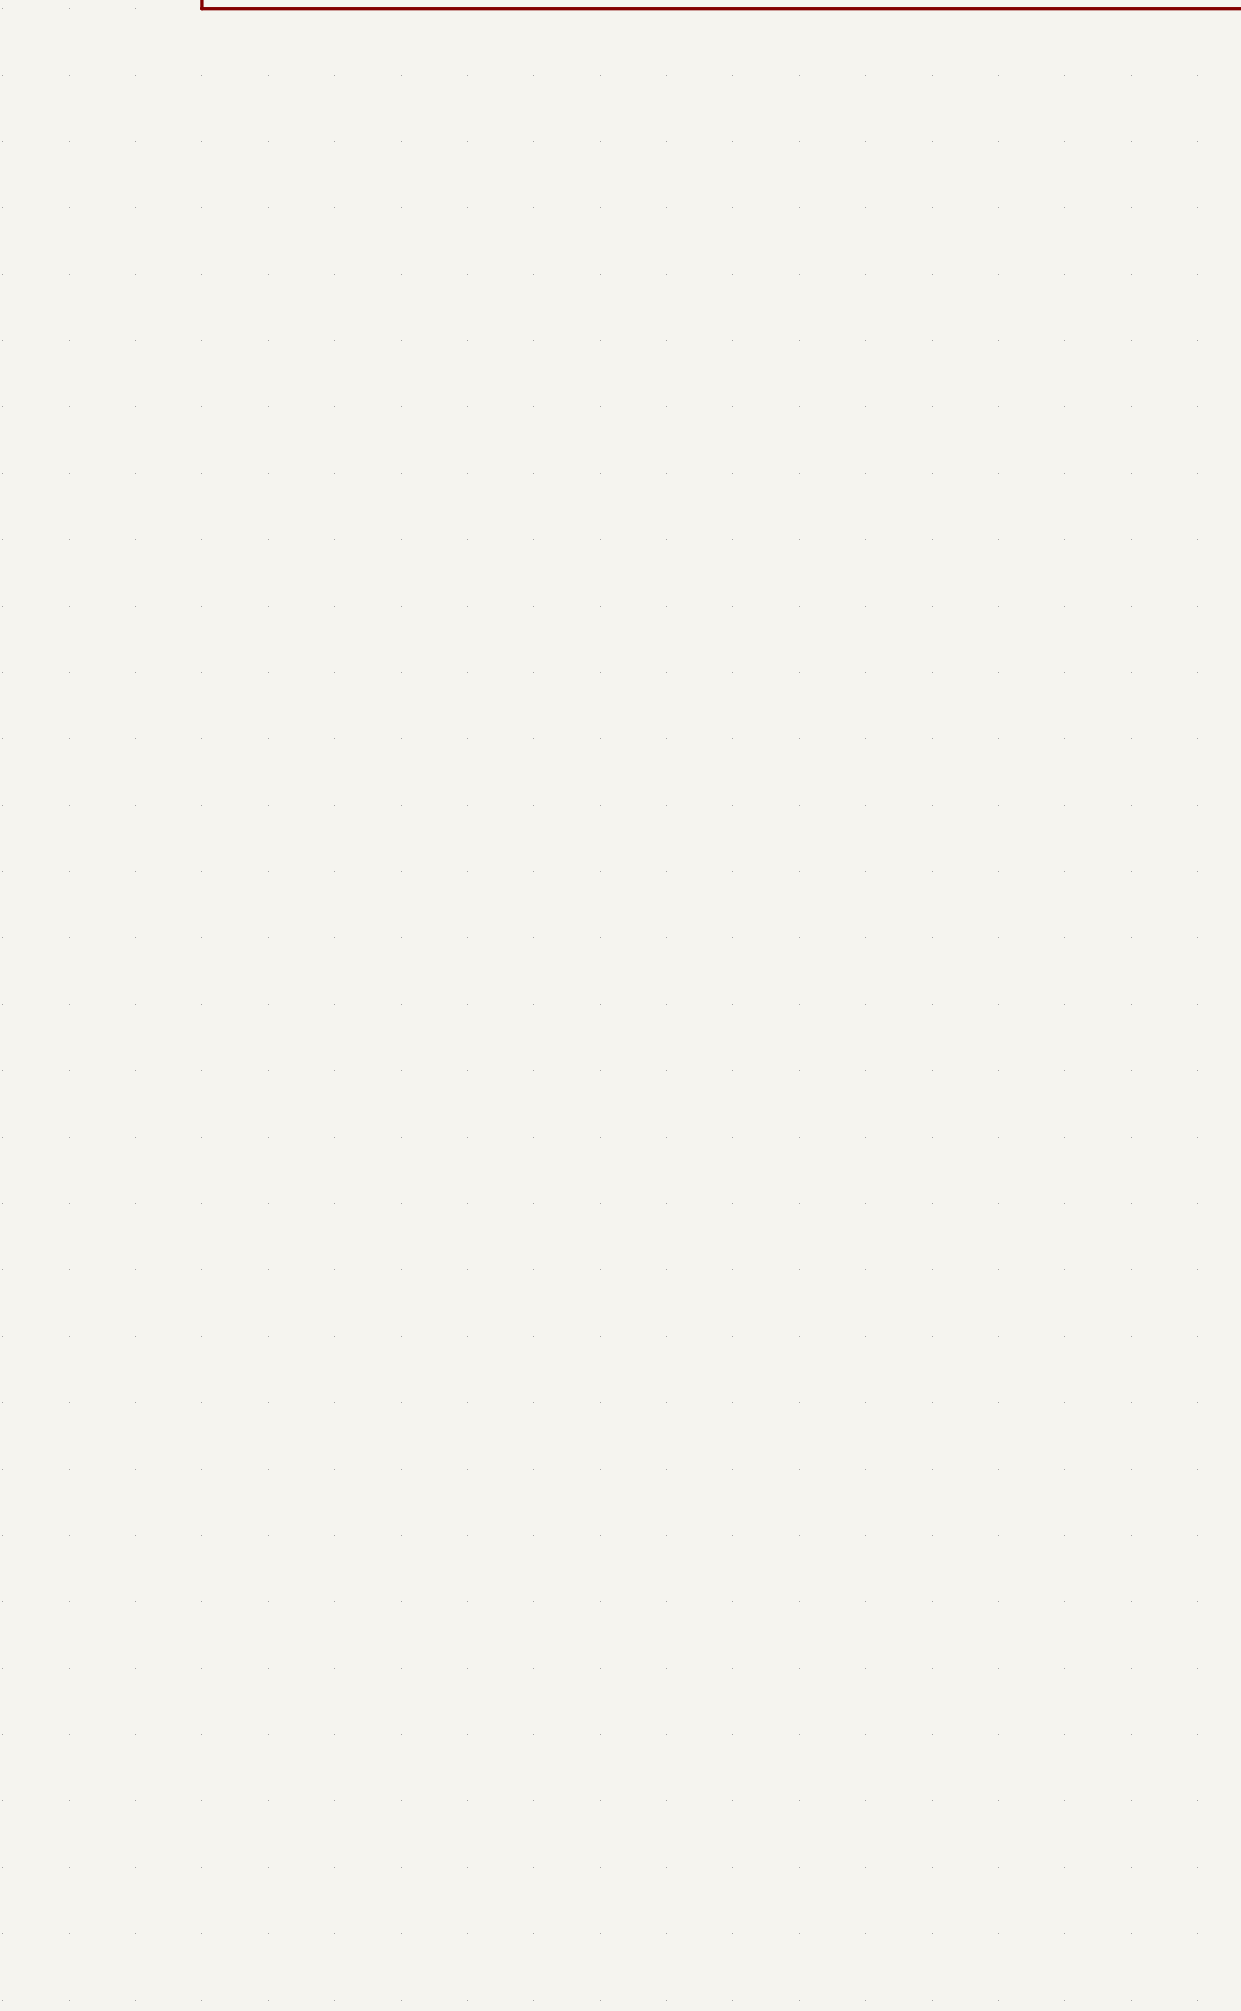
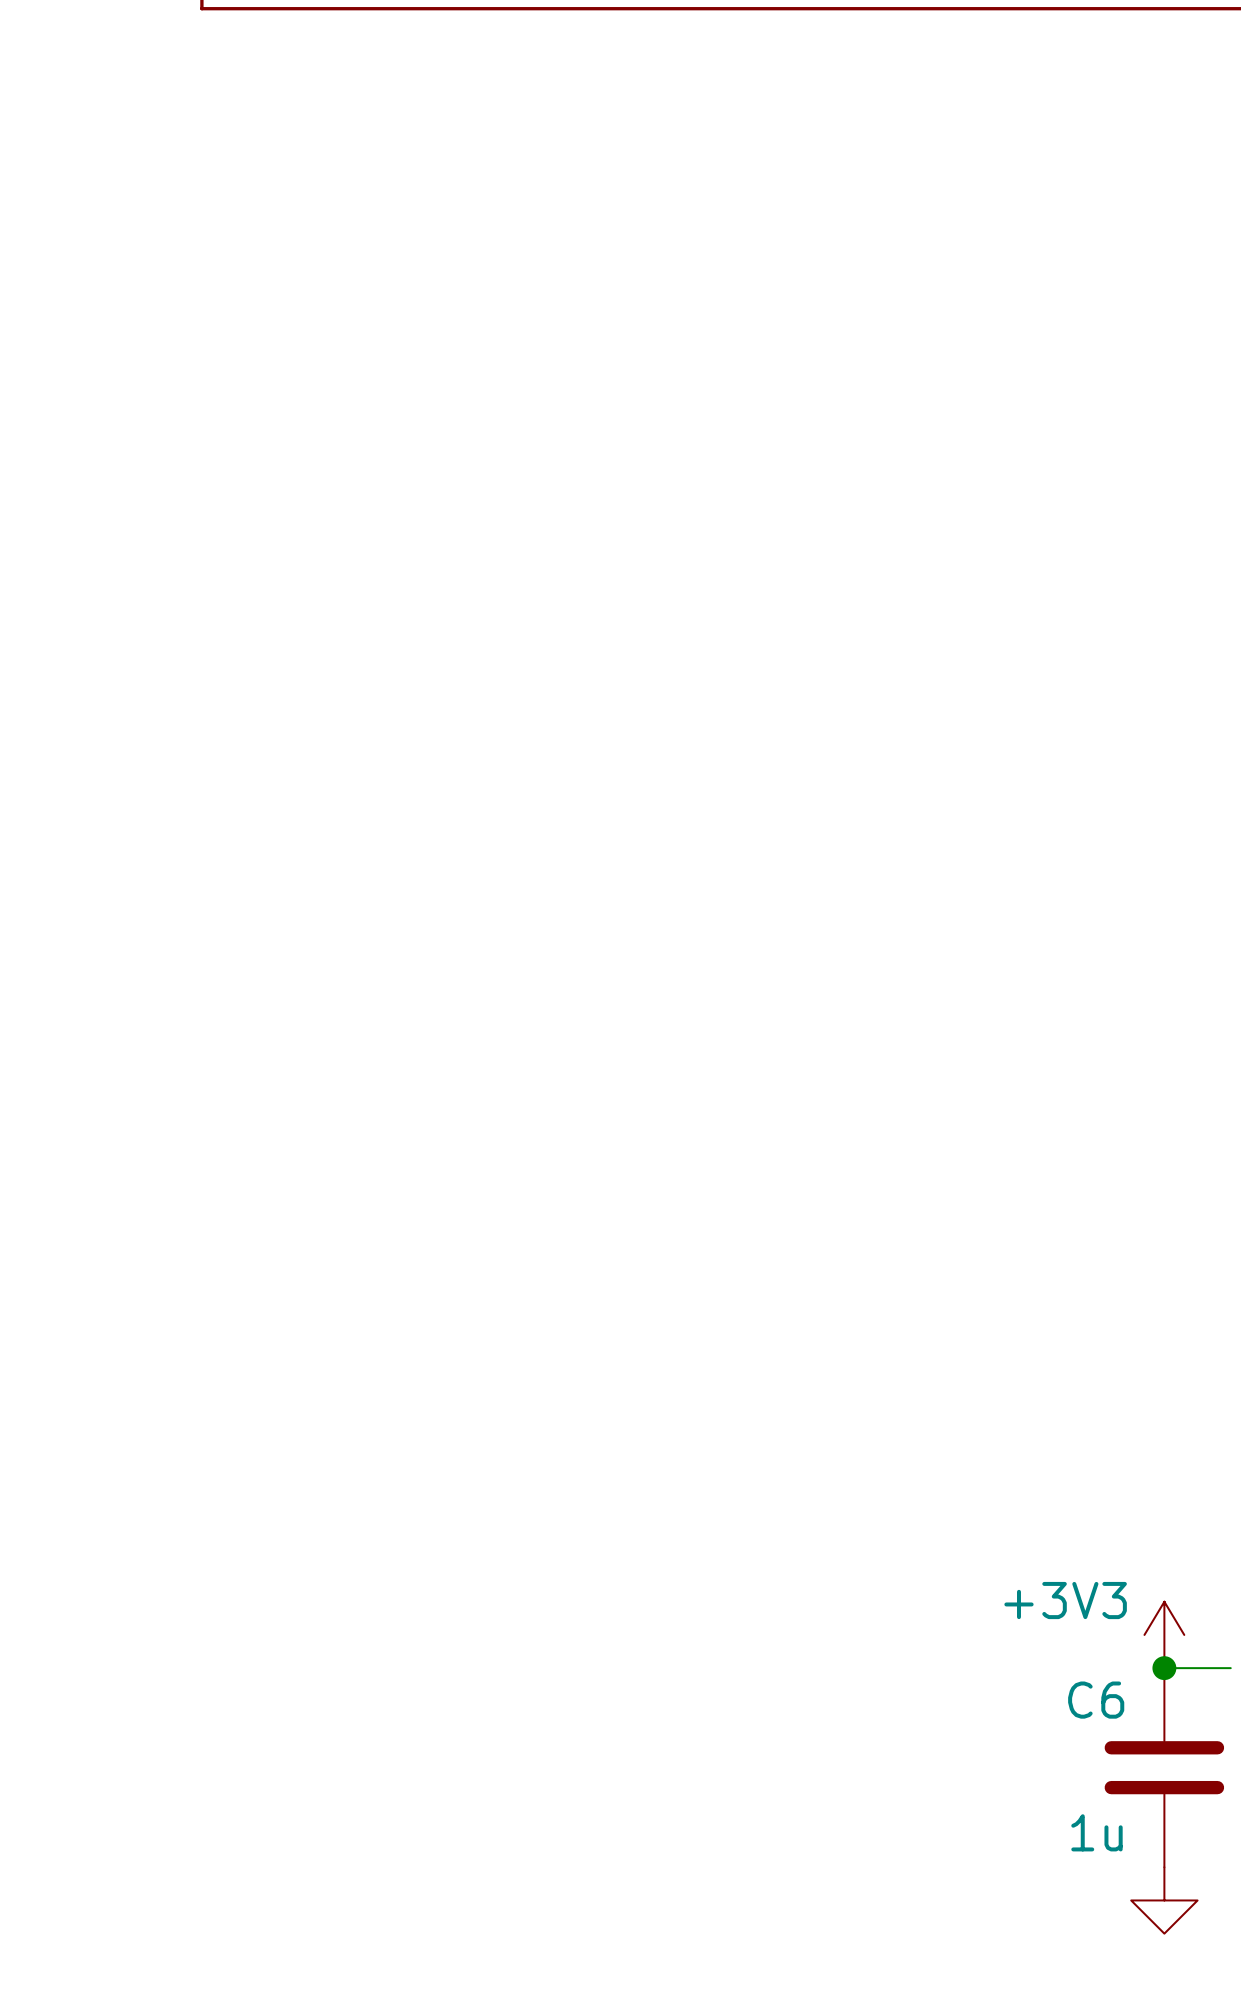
power symbol: none -> +3V3 (1164, 1634)
wire: none -> (1164, 1668) (1230, 1668)
junction: none -> (1164, 1668)
C6: none -> 1u (1164, 1767)
power symbol: none -> (1164, 1900)

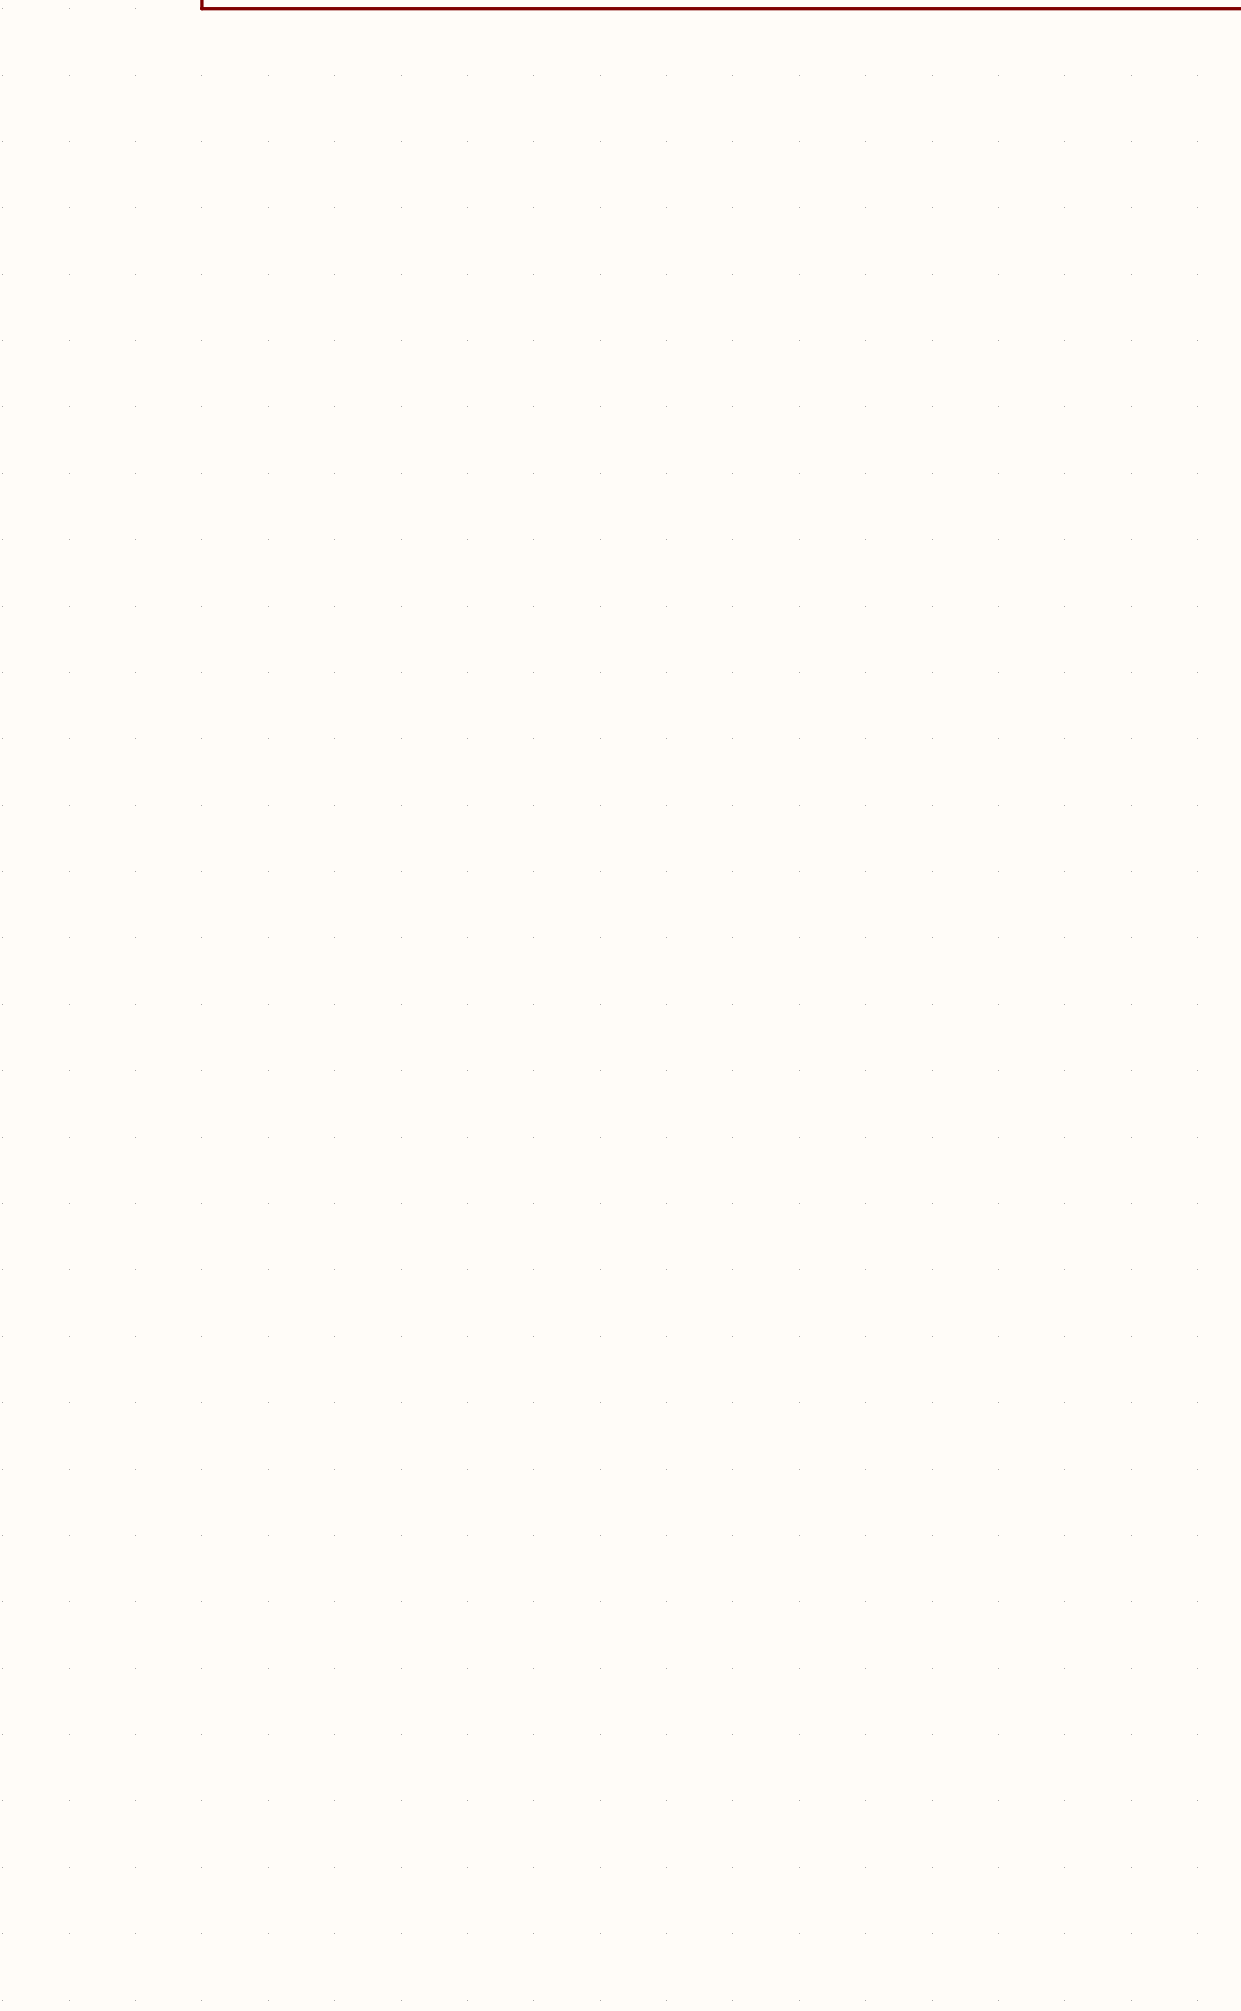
power symbol: +3V3 (1164, 1634) -> none
wire: (1164, 1668) (1230, 1668) -> none
junction: (1164, 1668) -> none
C6: 1u (1164, 1767) -> none
power symbol: (1164, 1900) -> none

